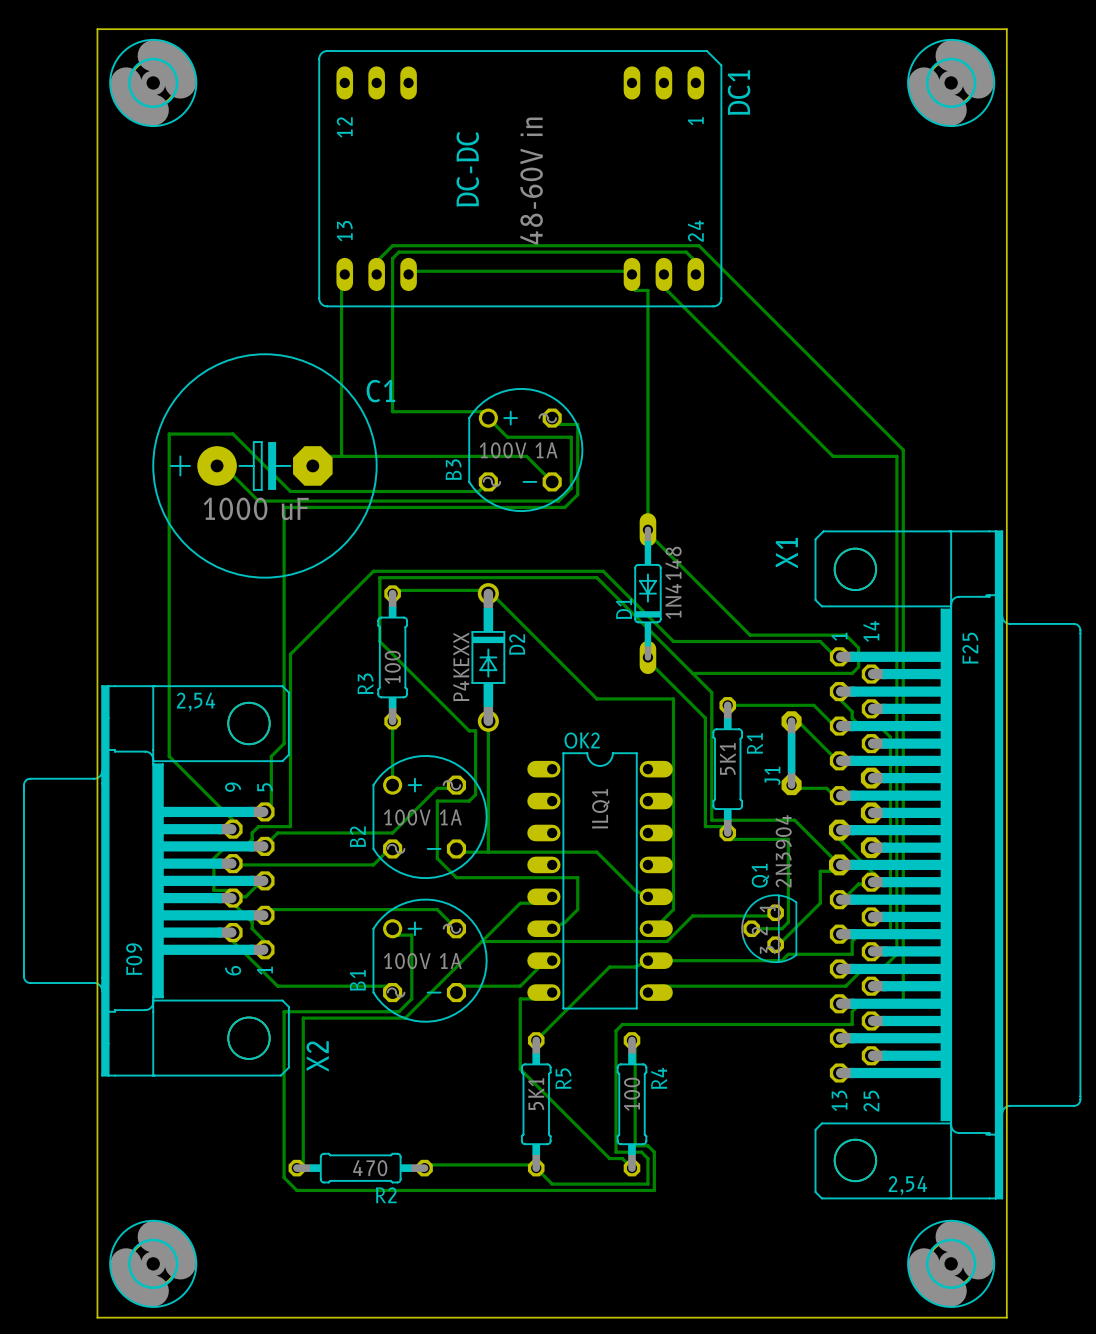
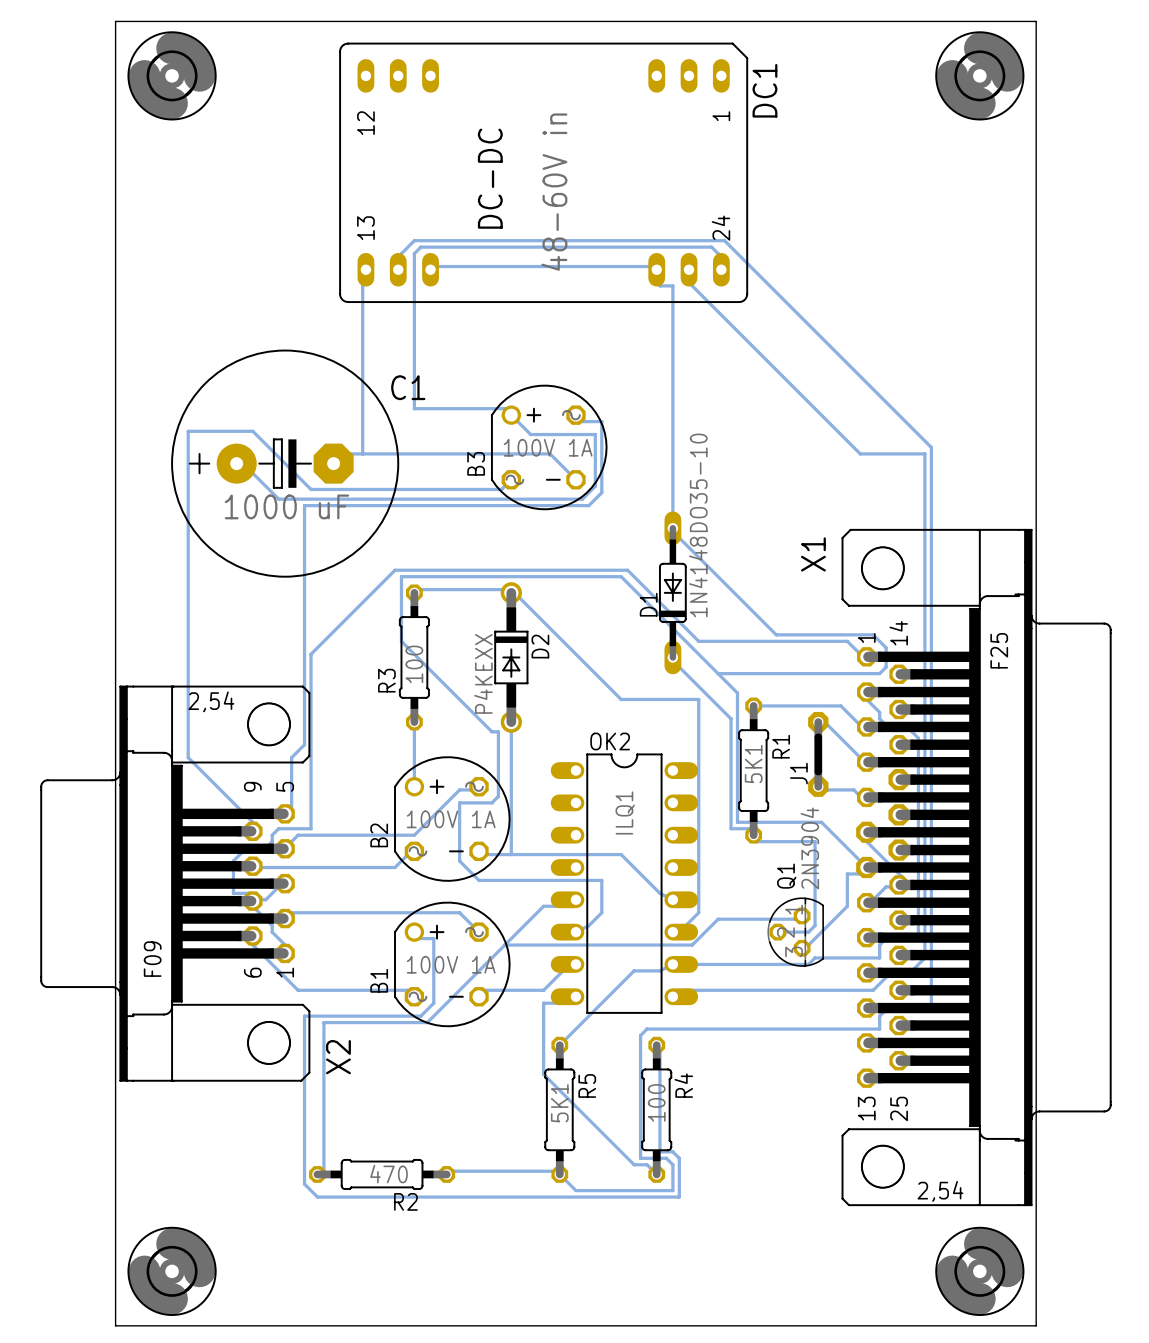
D1 value: 1N4148 (673, 582) -> 1N4148DO35-10 (698, 525)

